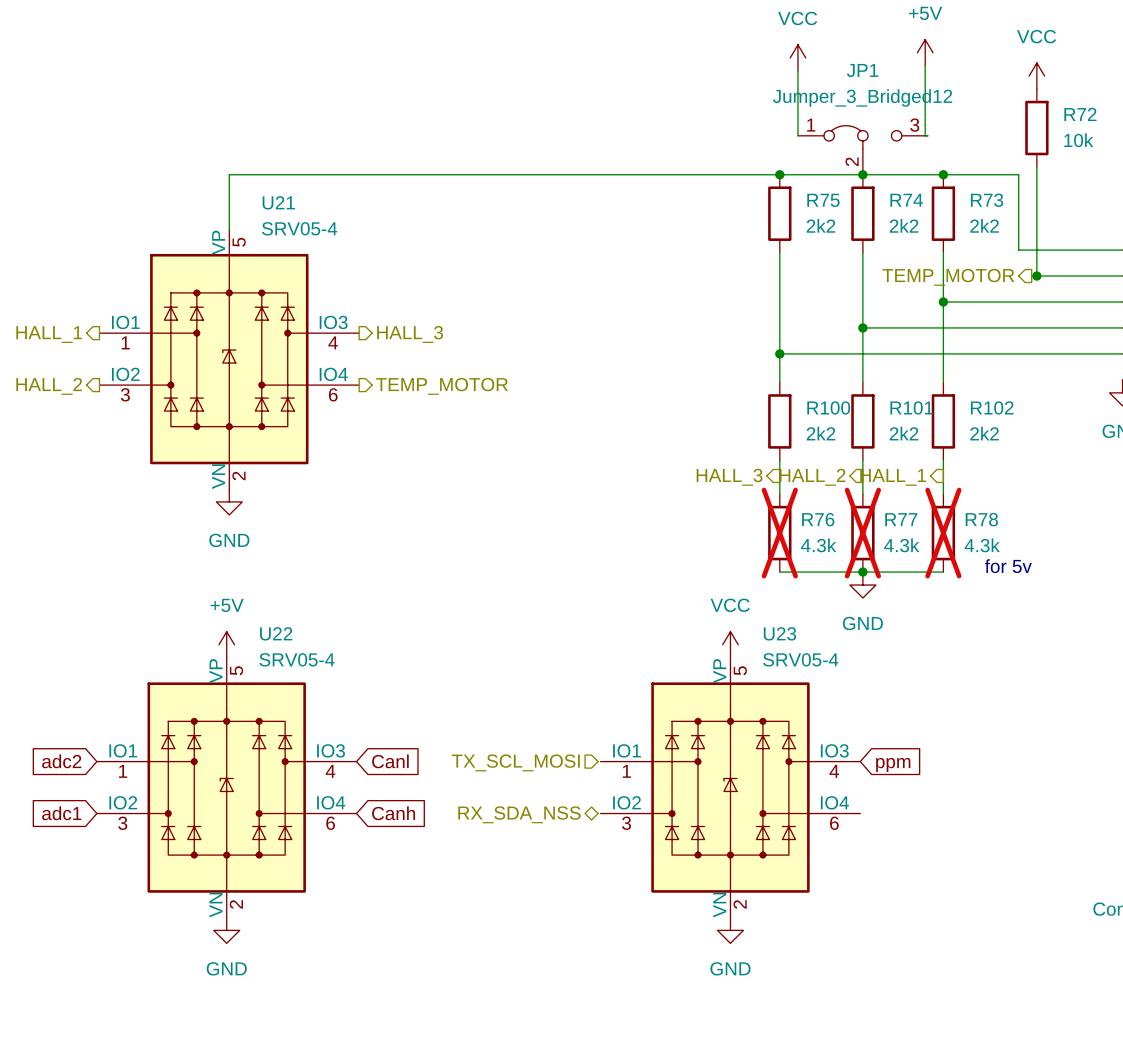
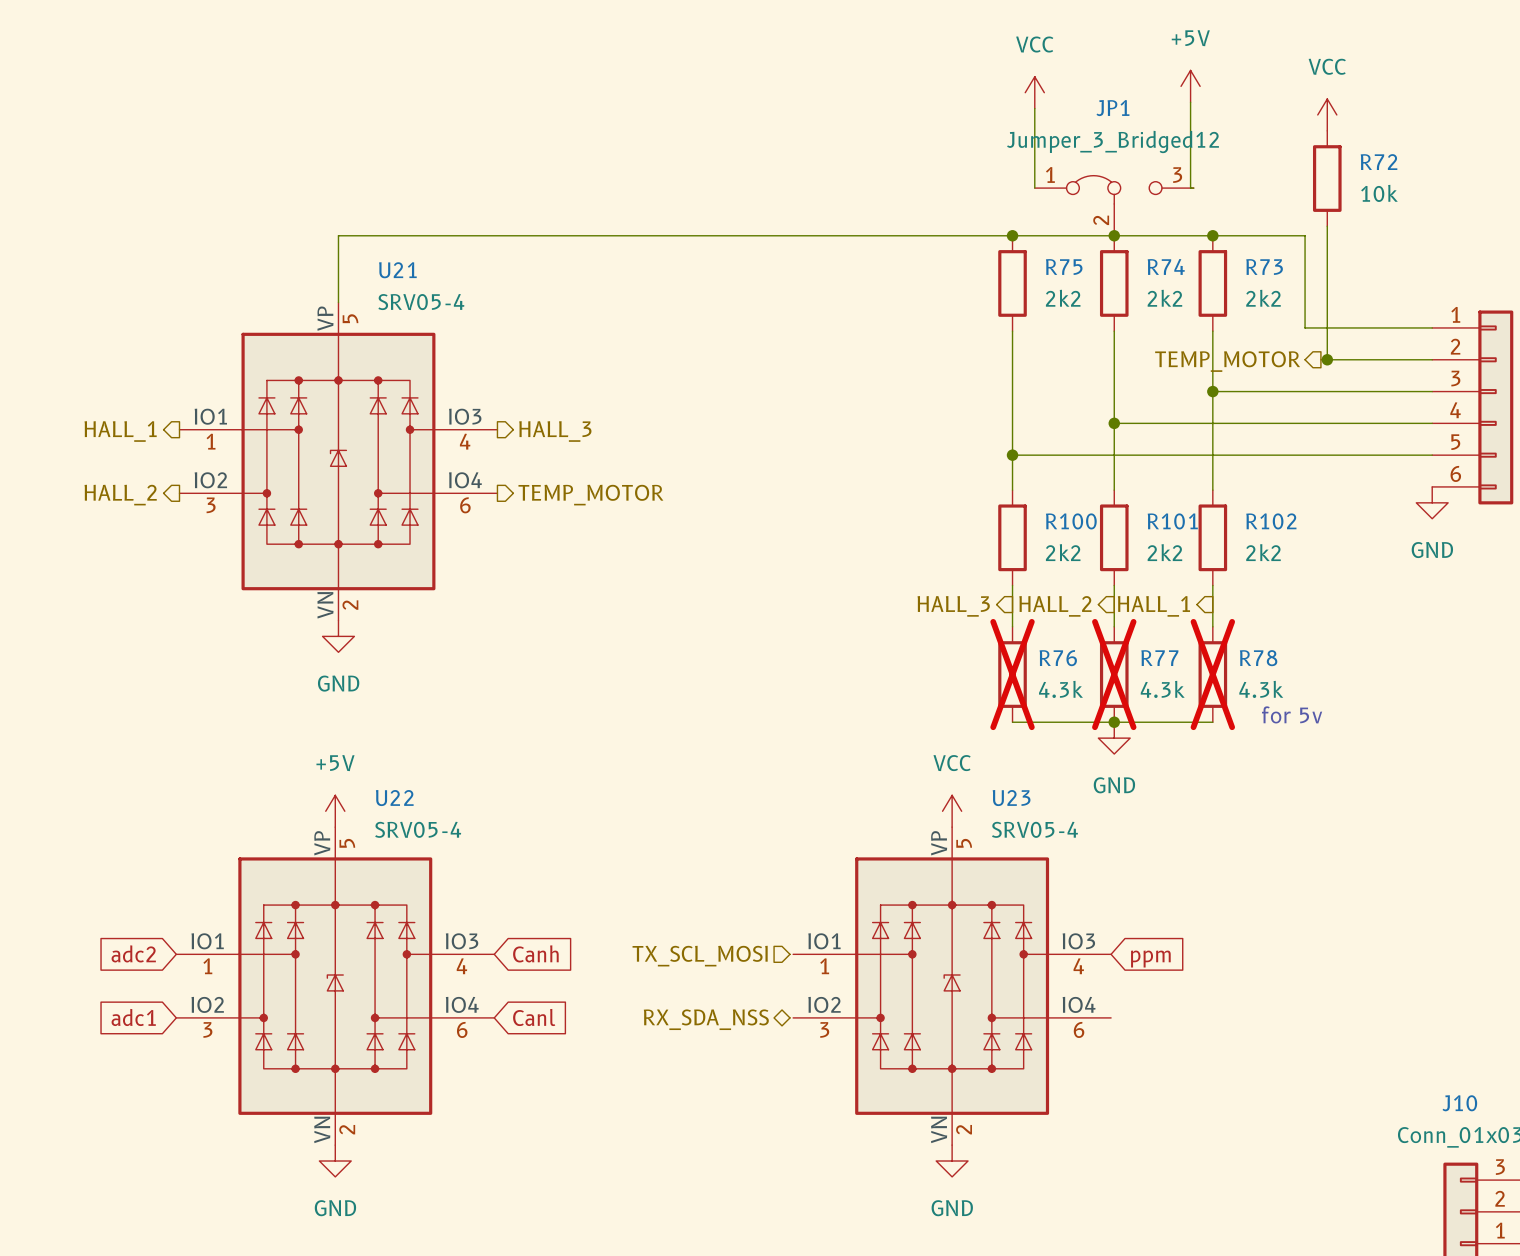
global label: Canl (390, 761) -> Canh (535, 953)
global label: Canh (393, 813) -> Canl (534, 1017)

